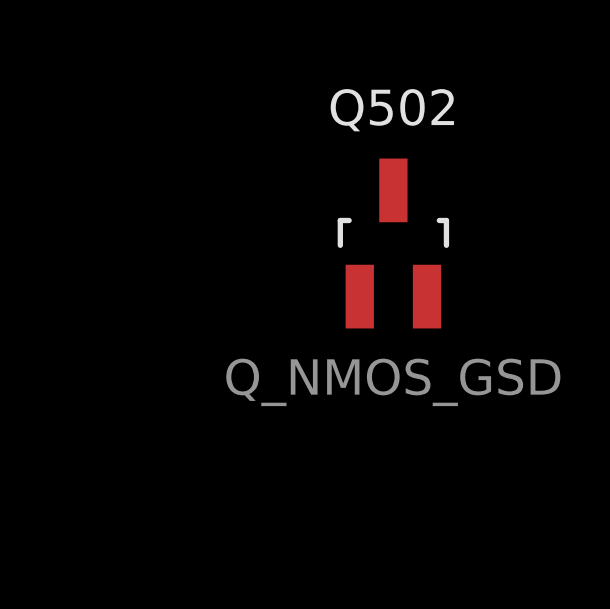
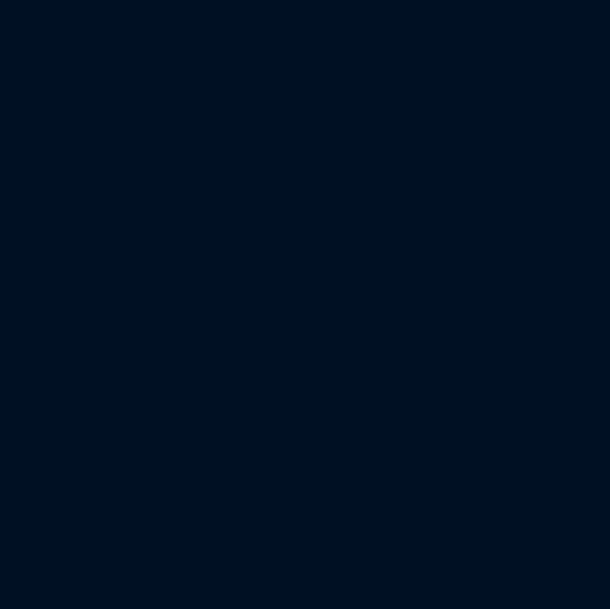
Q502: Q_NMOS_GSD (393, 243) -> none

